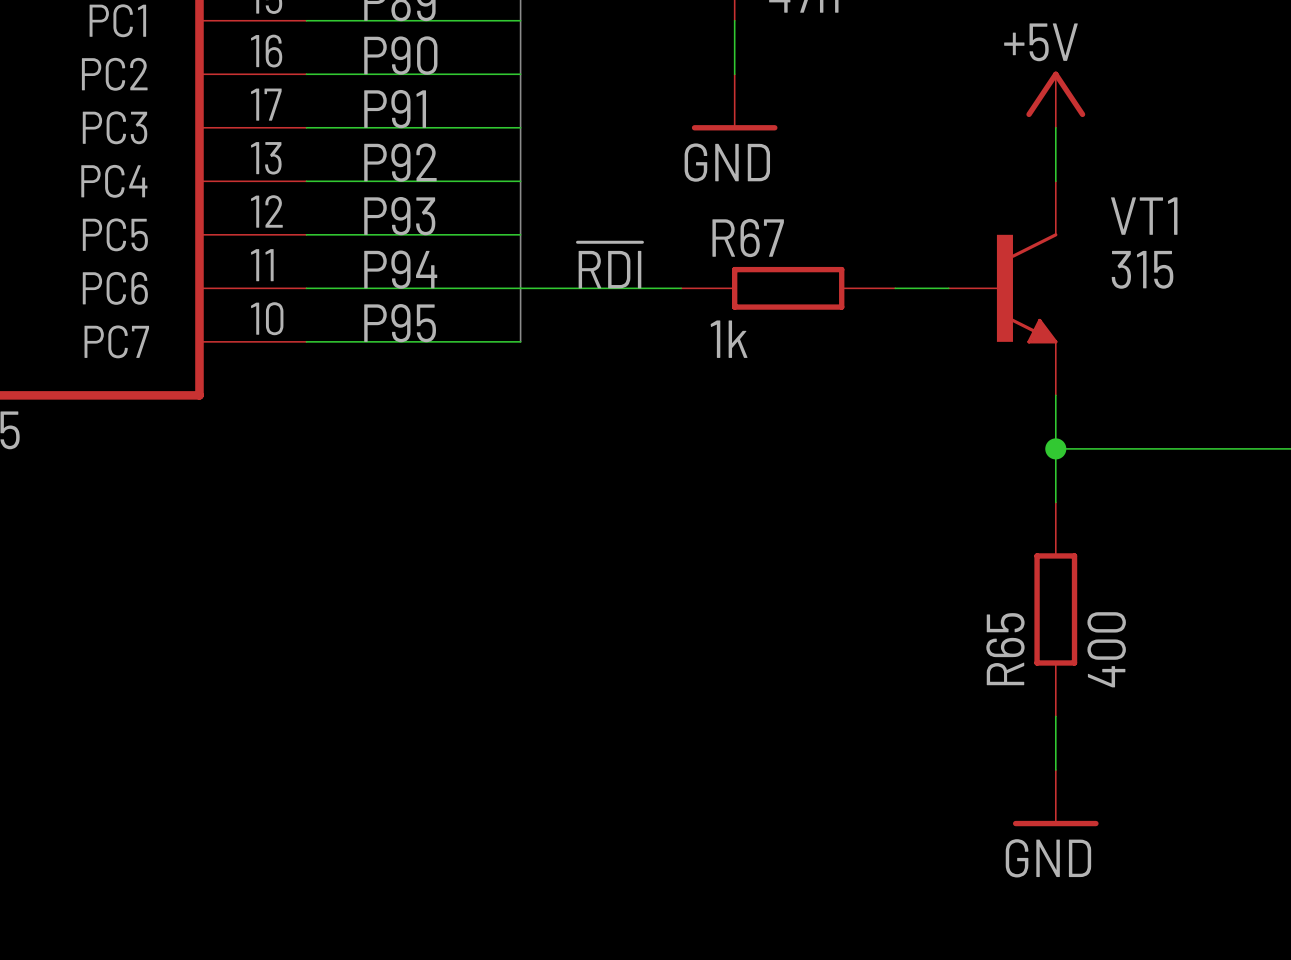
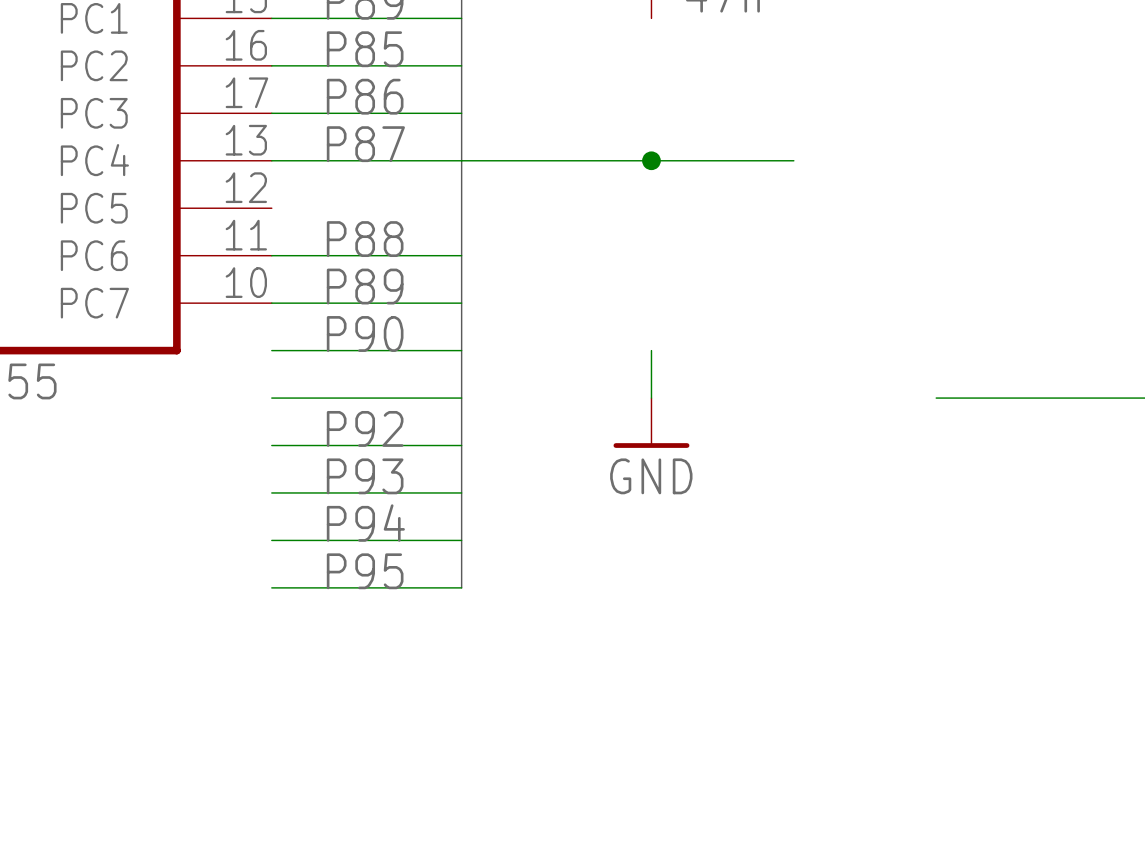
wire: (734, 20) (734, 74) -> (651, 350) (651, 398)
label: P90 (400, 55) -> P85 (365, 49)
power symbol: +5V (1055, 99) -> none
power symbol: GND (734, 102) -> none
label: P91 (395, 109) -> P86 (365, 96)
wire: (1055, 127) (1055, 181) -> none
label: P92 (400, 162) -> P87 (365, 144)
wire: none -> (461, 160) (793, 160)
junction: none -> (651, 160)
label position: P93 (399, 216) -> P93 (365, 476)
wire: (306, 234) (520, 234) -> (271, 492) (461, 492)
label: ~{RDI} (609, 265) -> none
label: P94 (400, 269) -> P88 (365, 239)
wire: (520, 288) (681, 288) -> none
R67: 1k (788, 288) -> none
wire: (895, 288) (948, 288) -> none
VT1: 315 (1003, 288) -> none
label: P95 (400, 323) -> P89 (365, 286)
bus: none -> (461, 303) (461, 587)
label: none -> P90 (365, 333)
wire: none -> (271, 350) (461, 350)
wire: (1055, 395) (1055, 502) -> none
wire: none -> (271, 398) (461, 398)
junction: (1055, 448) -> none
power symbol: none -> GND (651, 422)
label: none -> P92 (365, 428)
wire: none -> (271, 445) (461, 445)
label: none -> P94 (365, 523)
wire: none -> (271, 540) (461, 540)
R65: 400 (1055, 609) -> none
label: none -> P95 (365, 571)
wire: none -> (271, 587) (461, 587)
wire: (1055, 716) (1055, 770) -> none
power symbol: GND (1055, 798) -> none

